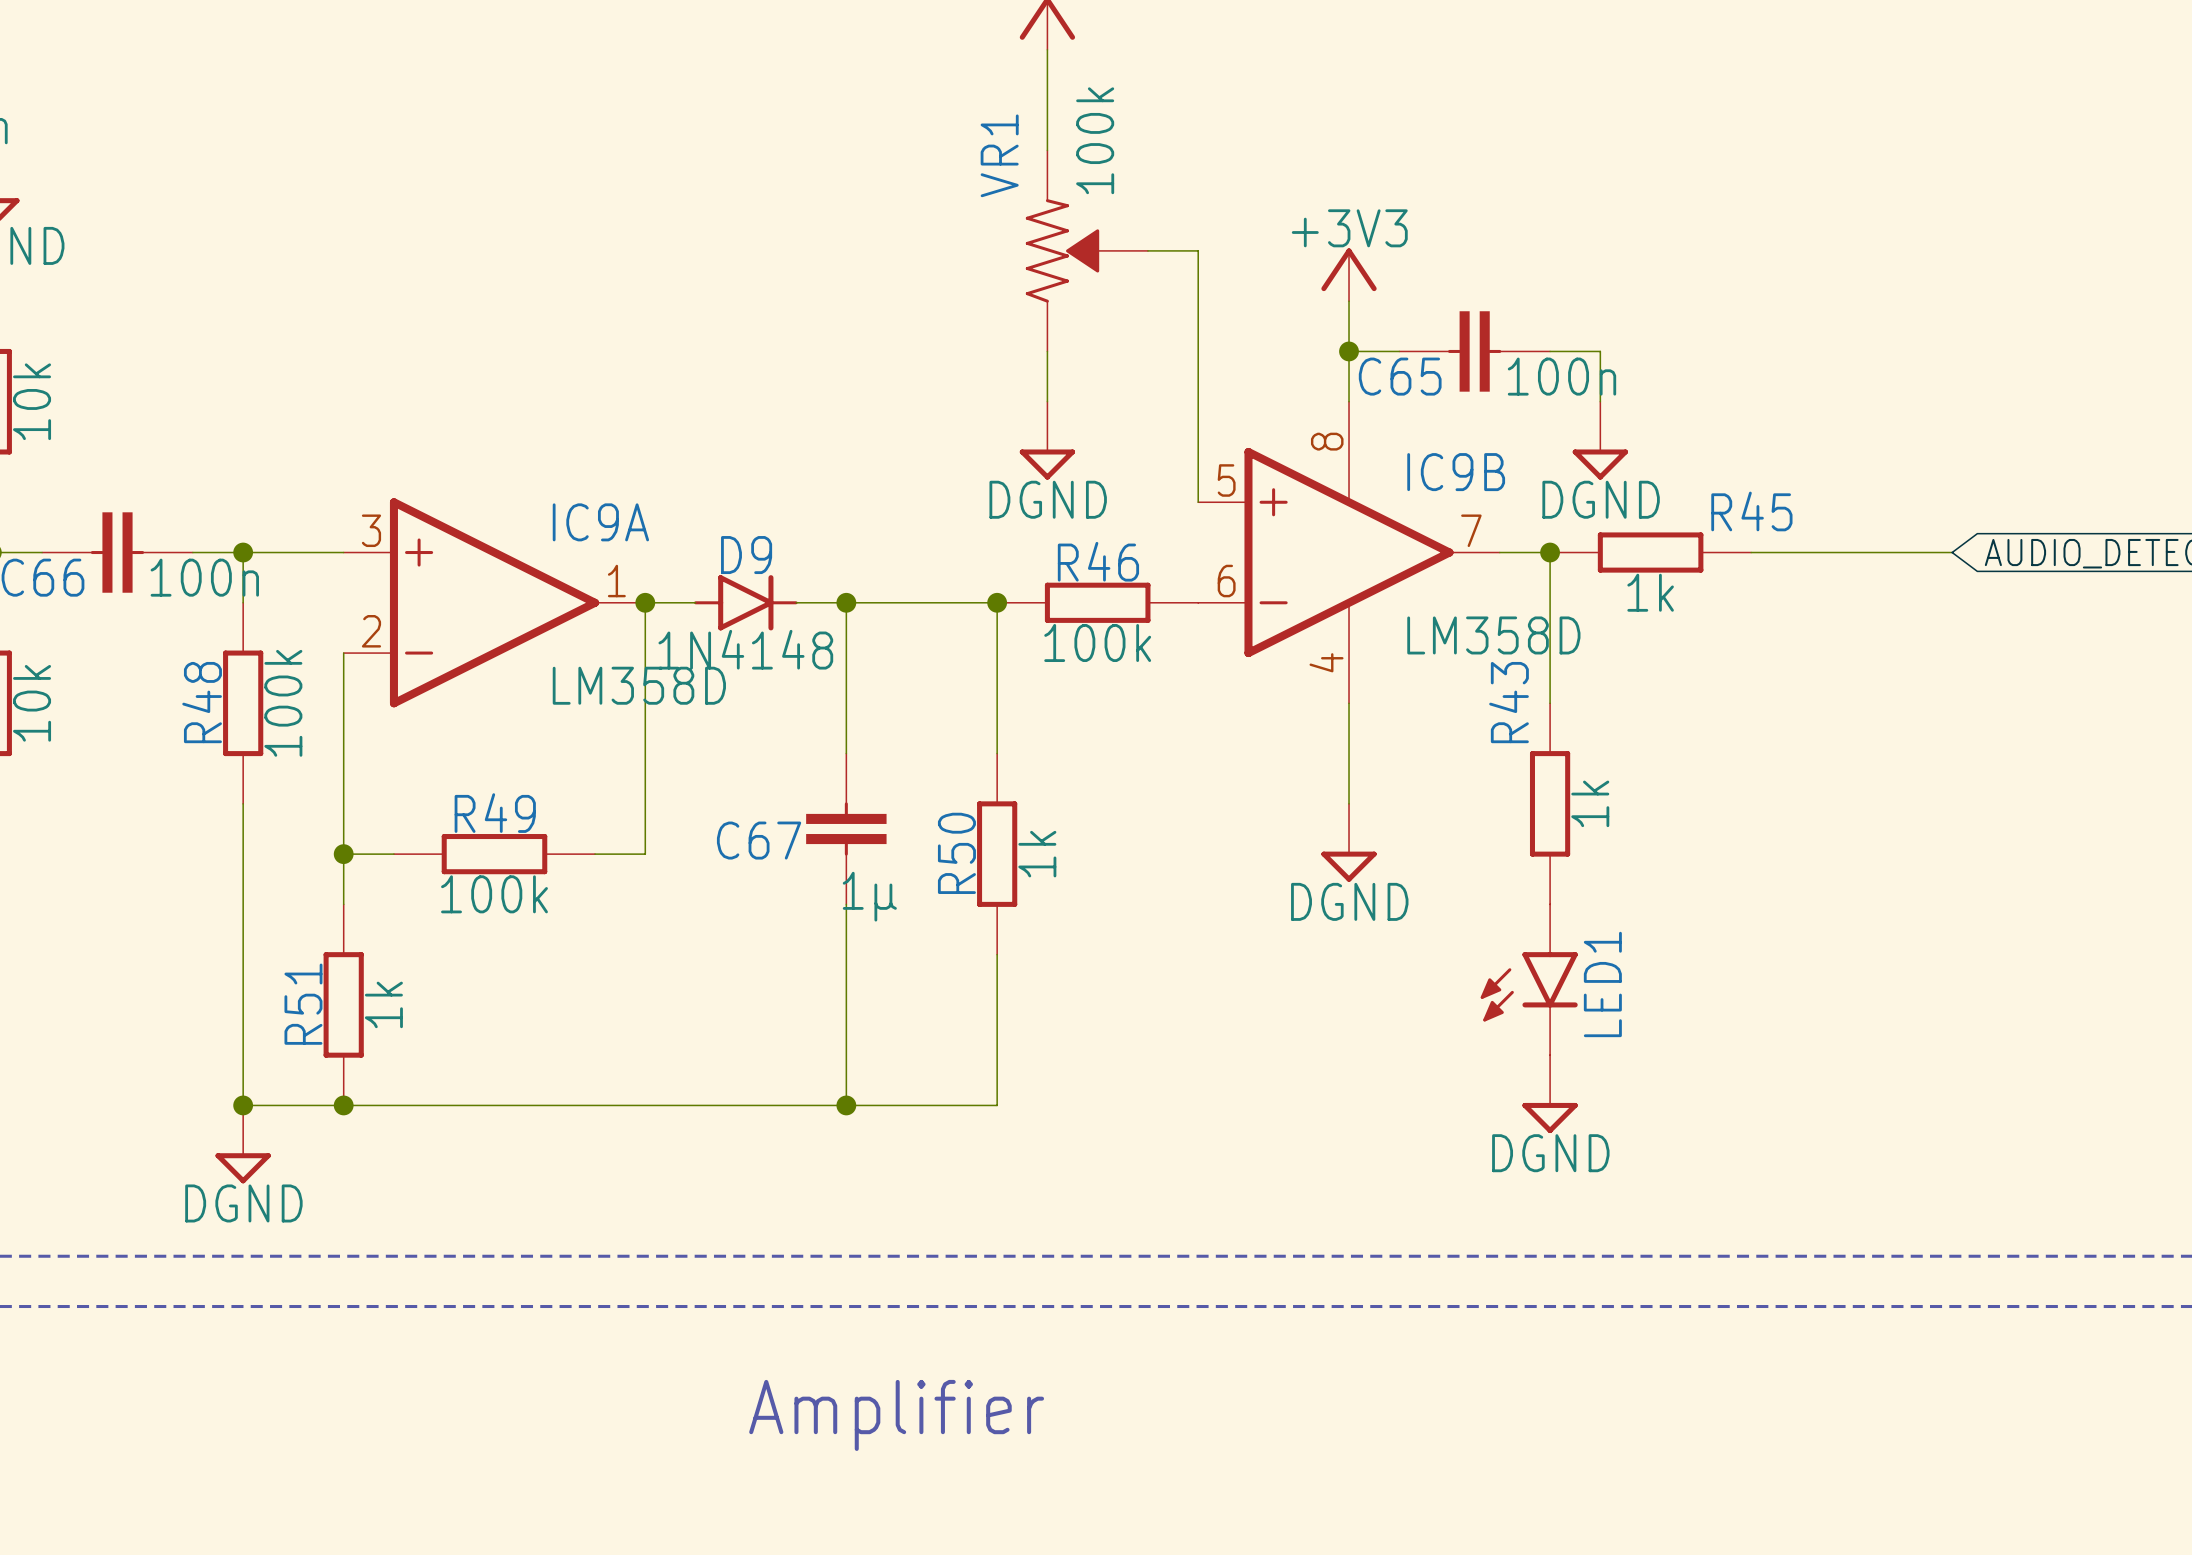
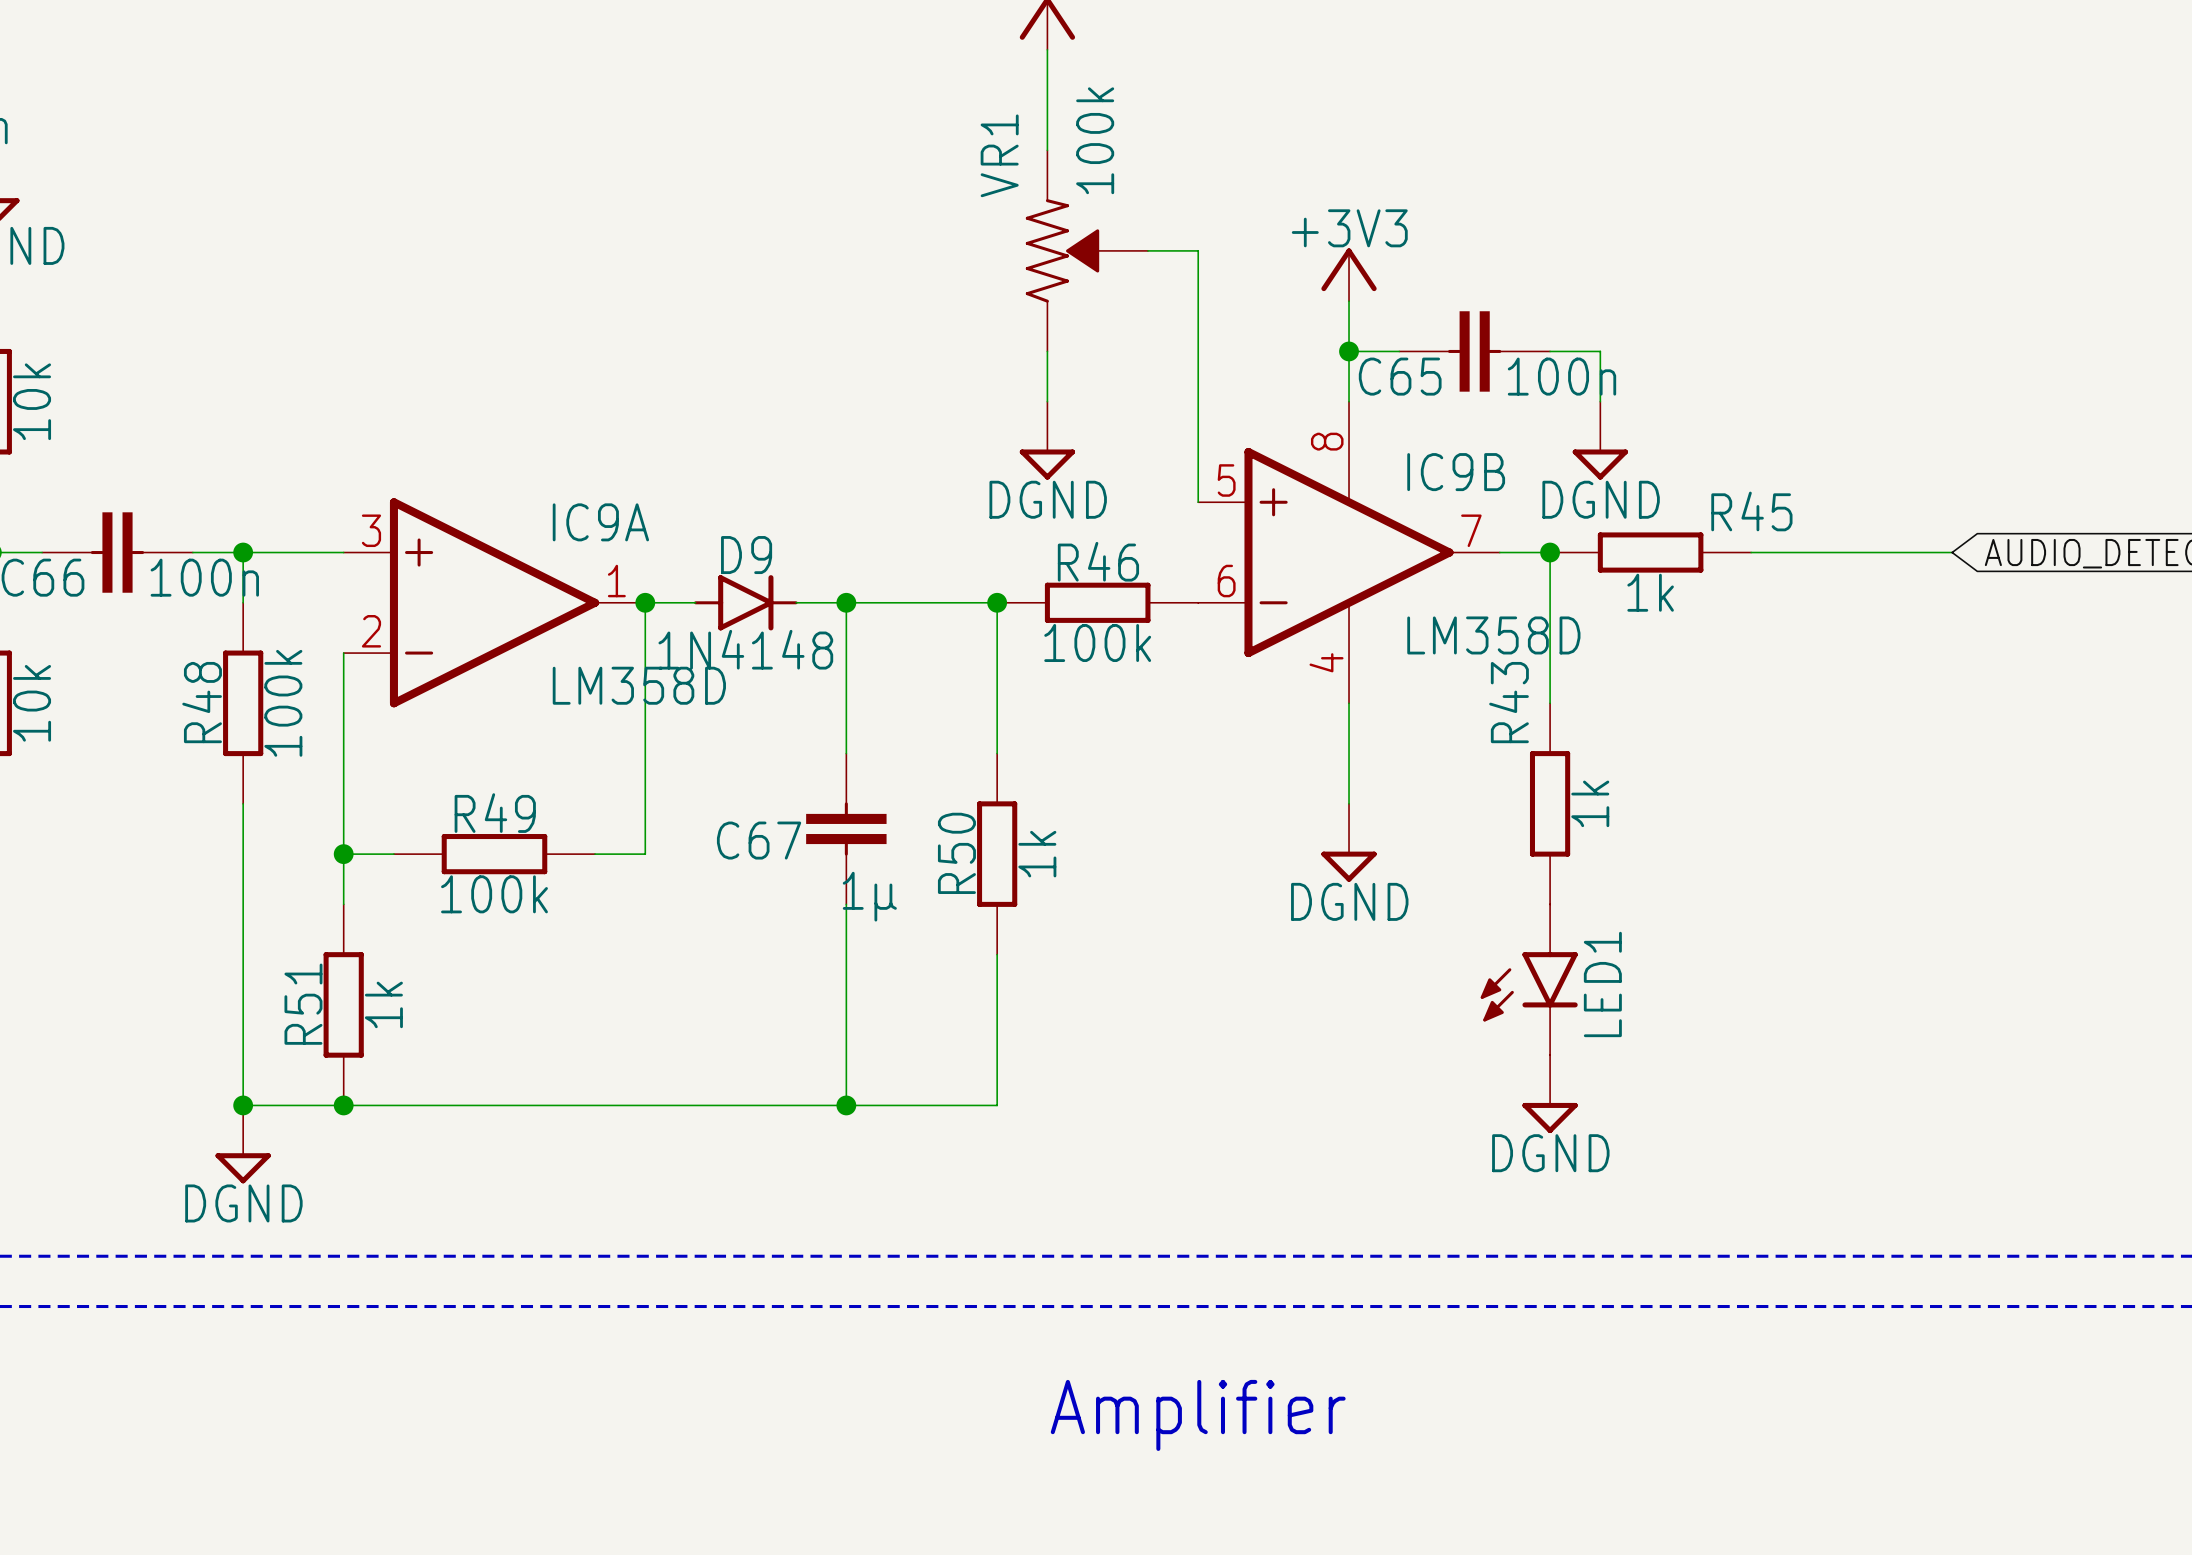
text position: Amplifier (896, 1415) -> Amplifier (1198, 1415)

